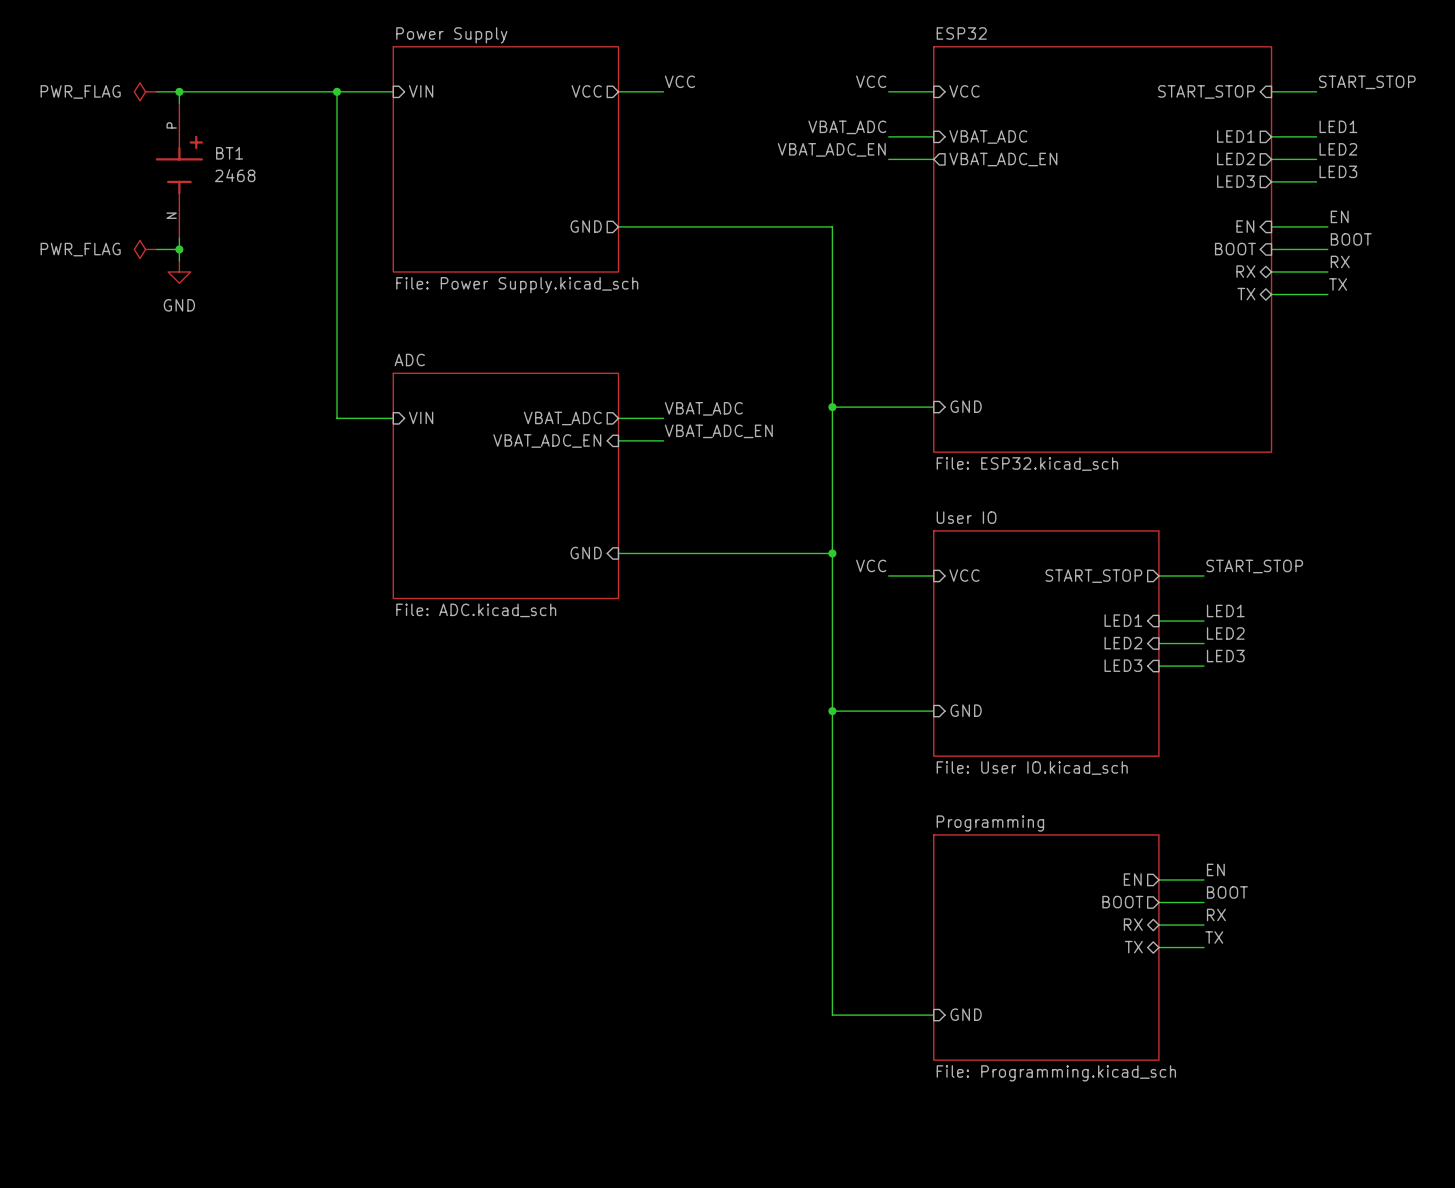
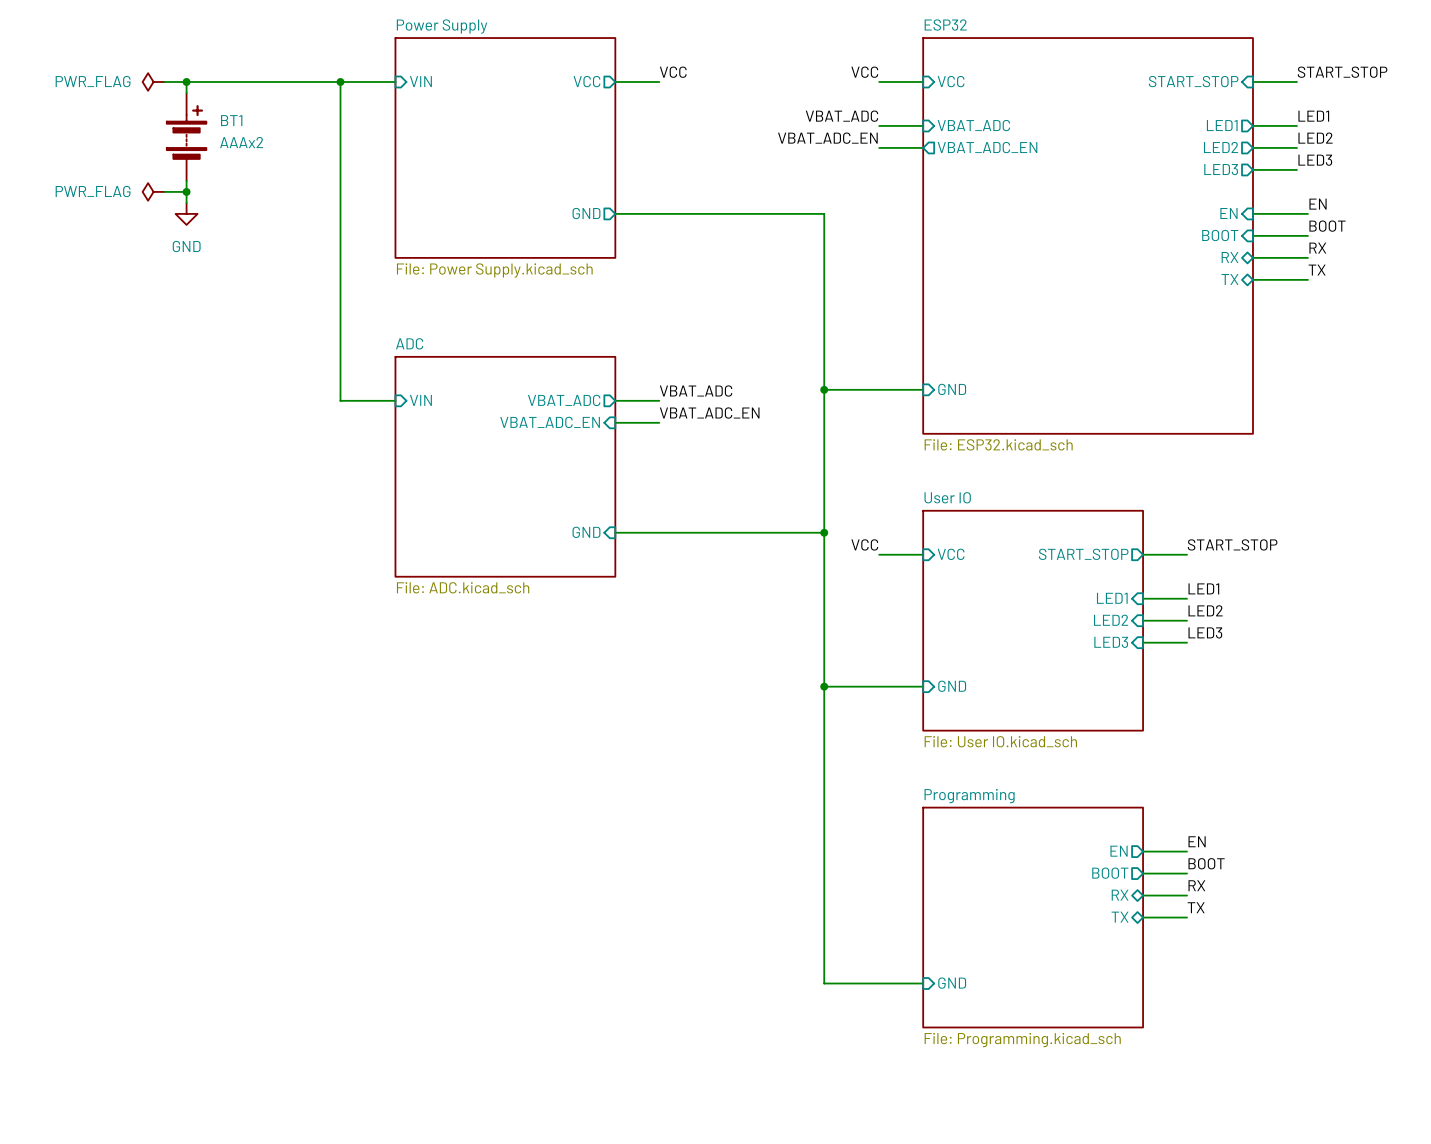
BT1 symbol: [155, 103, 204, 239] -> [166, 92, 207, 181]
BT1 value: 2468 (235, 175) -> AAAx2 (241, 142)
power symbol position: PWR_FLAG (145, 249) -> PWR_FLAG (153, 191)
wire: (156, 249) (179, 249) -> (164, 191) (186, 191)
junction position: (179, 249) -> (186, 191)
power symbol position: GND (179, 271) -> GND (186, 213)

